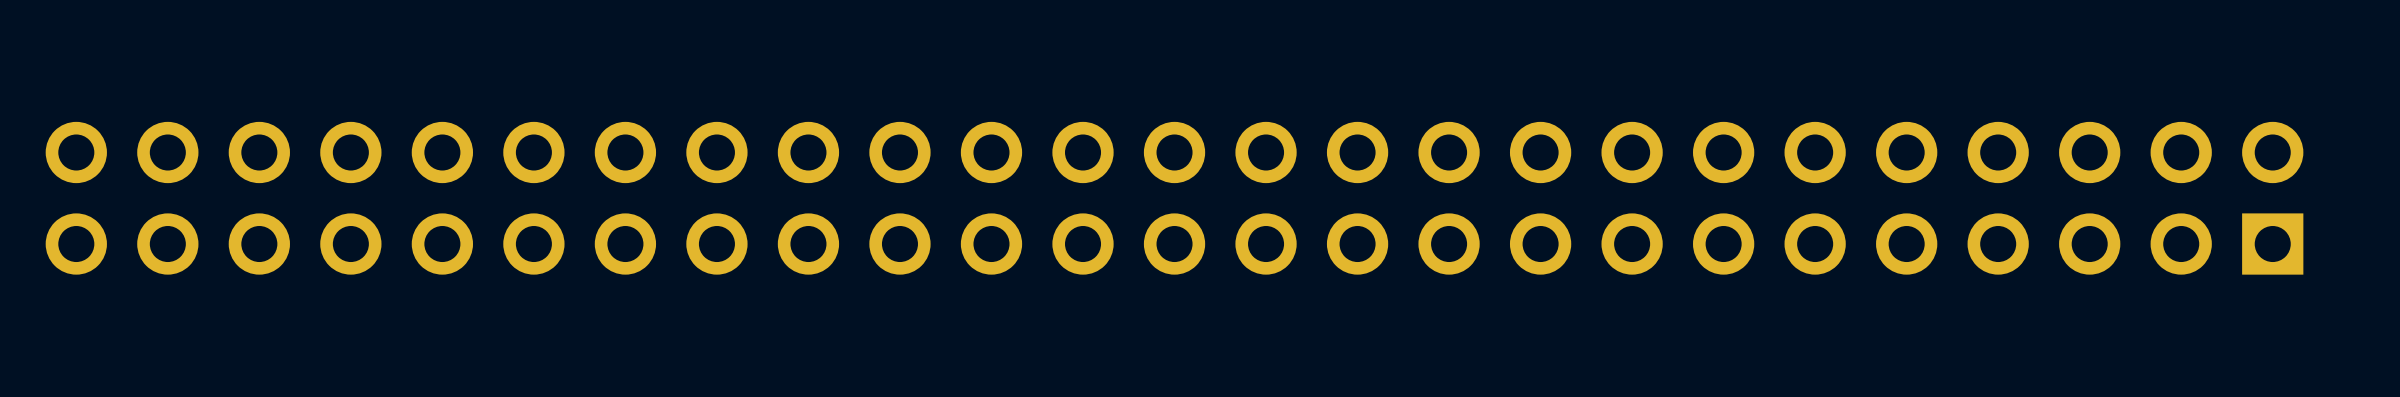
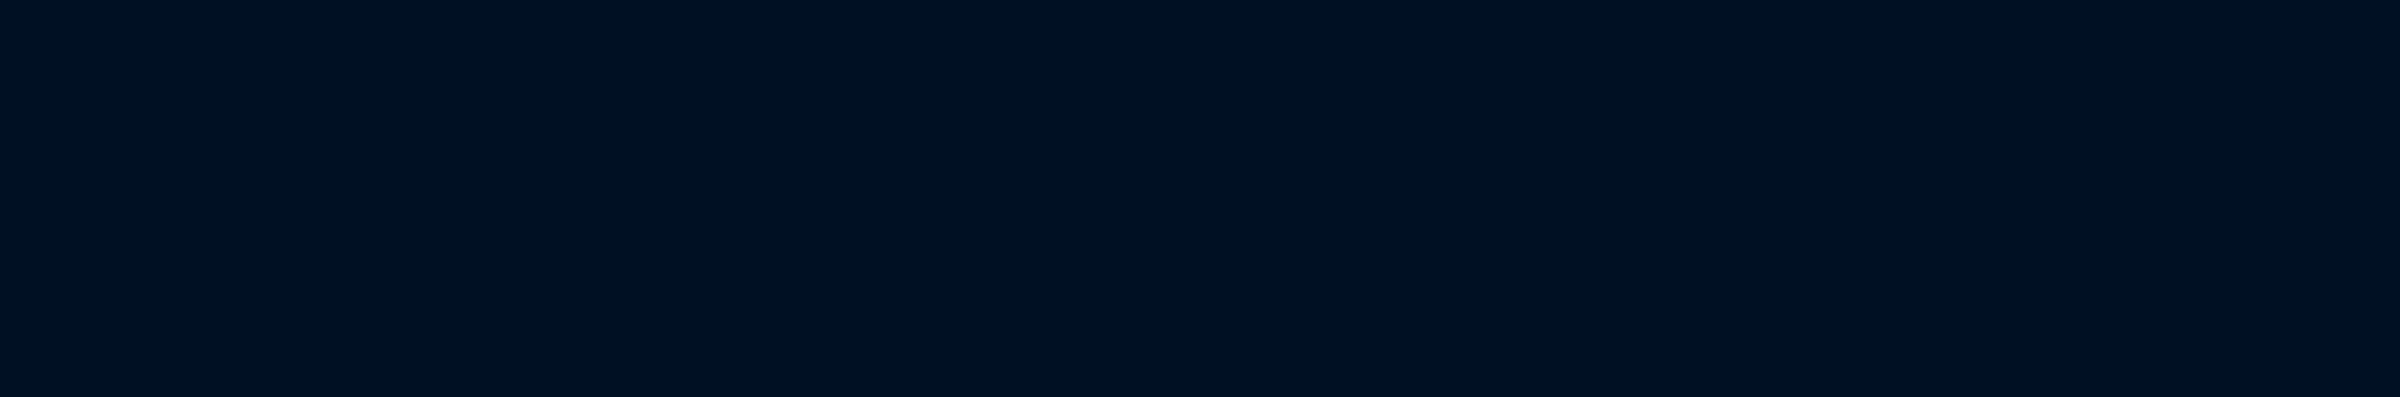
part: (1174, 198) -> none

